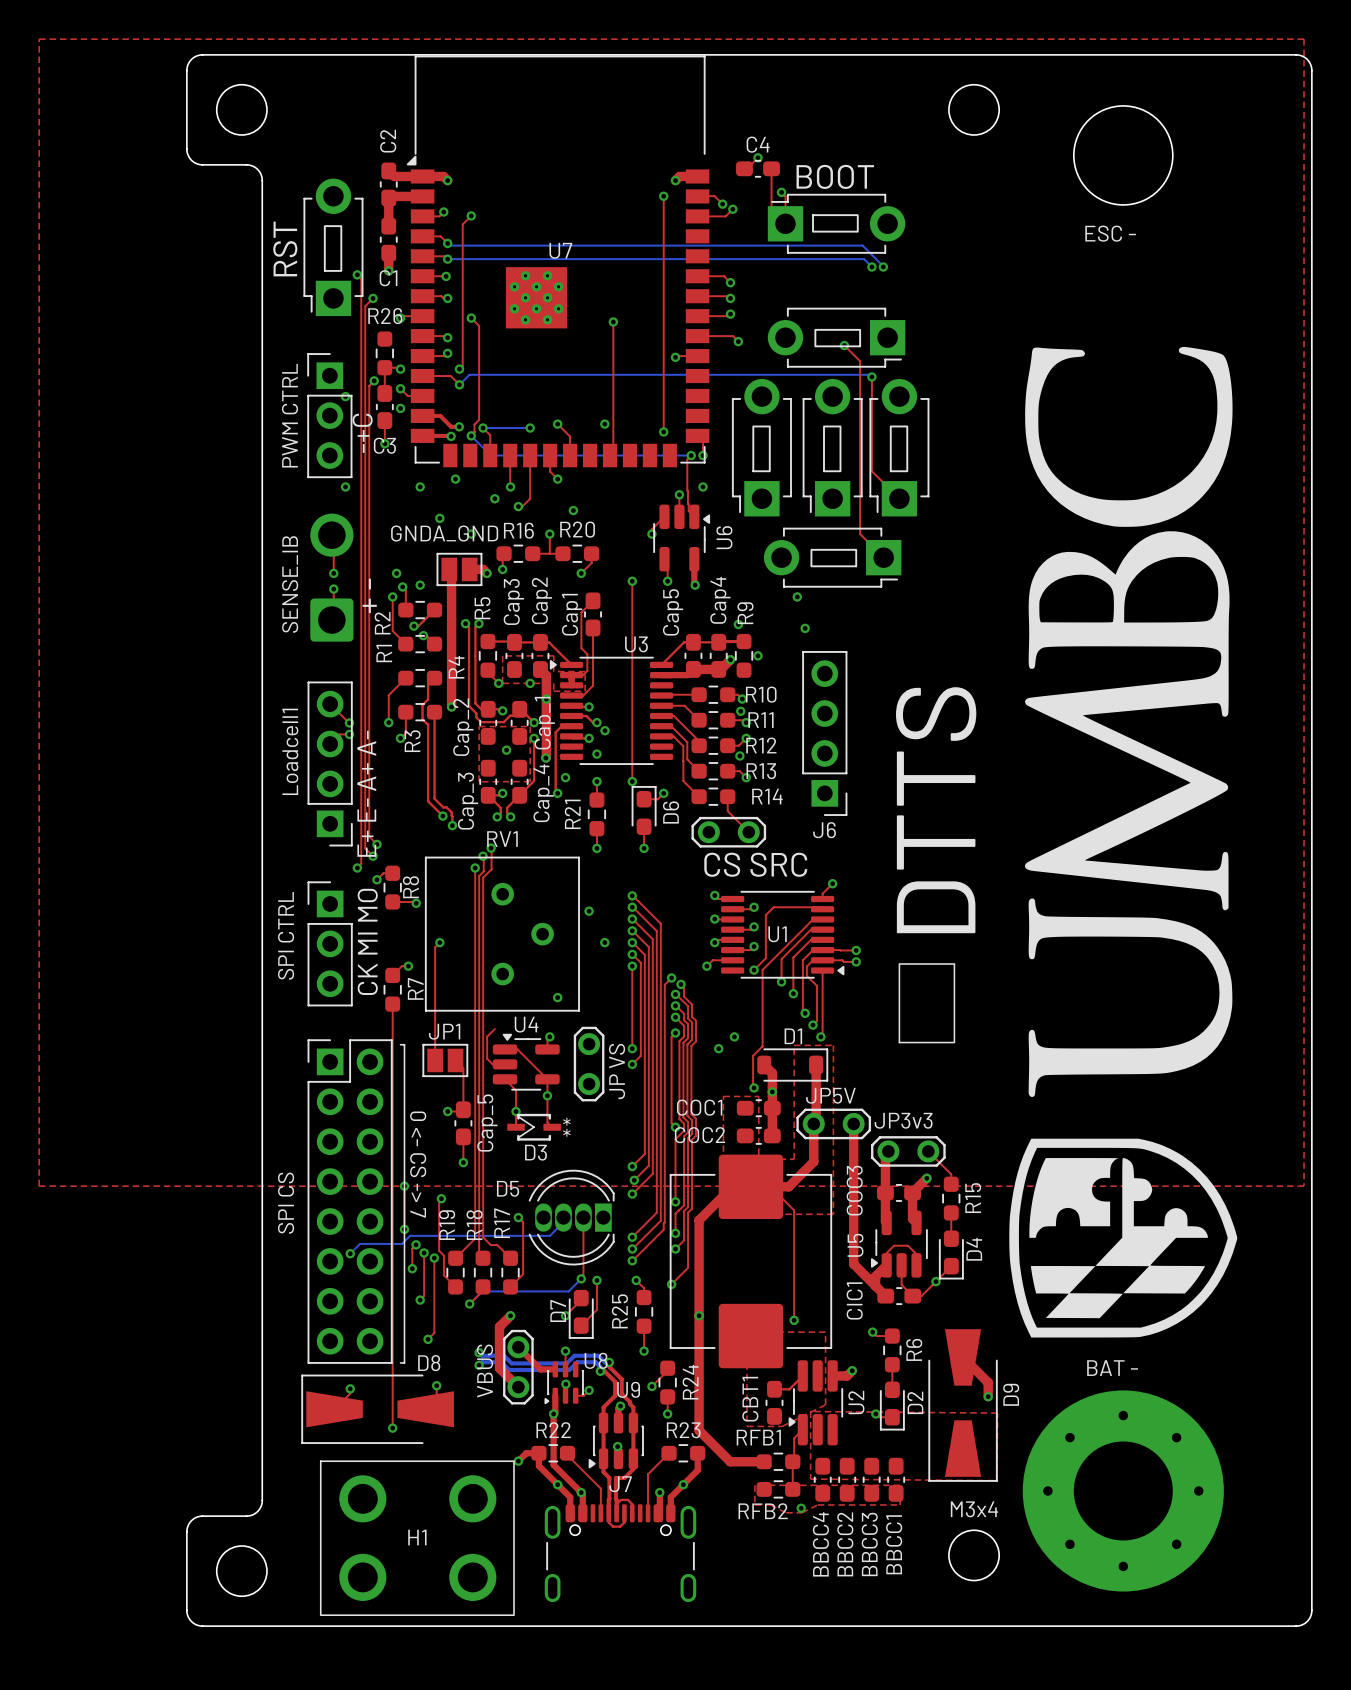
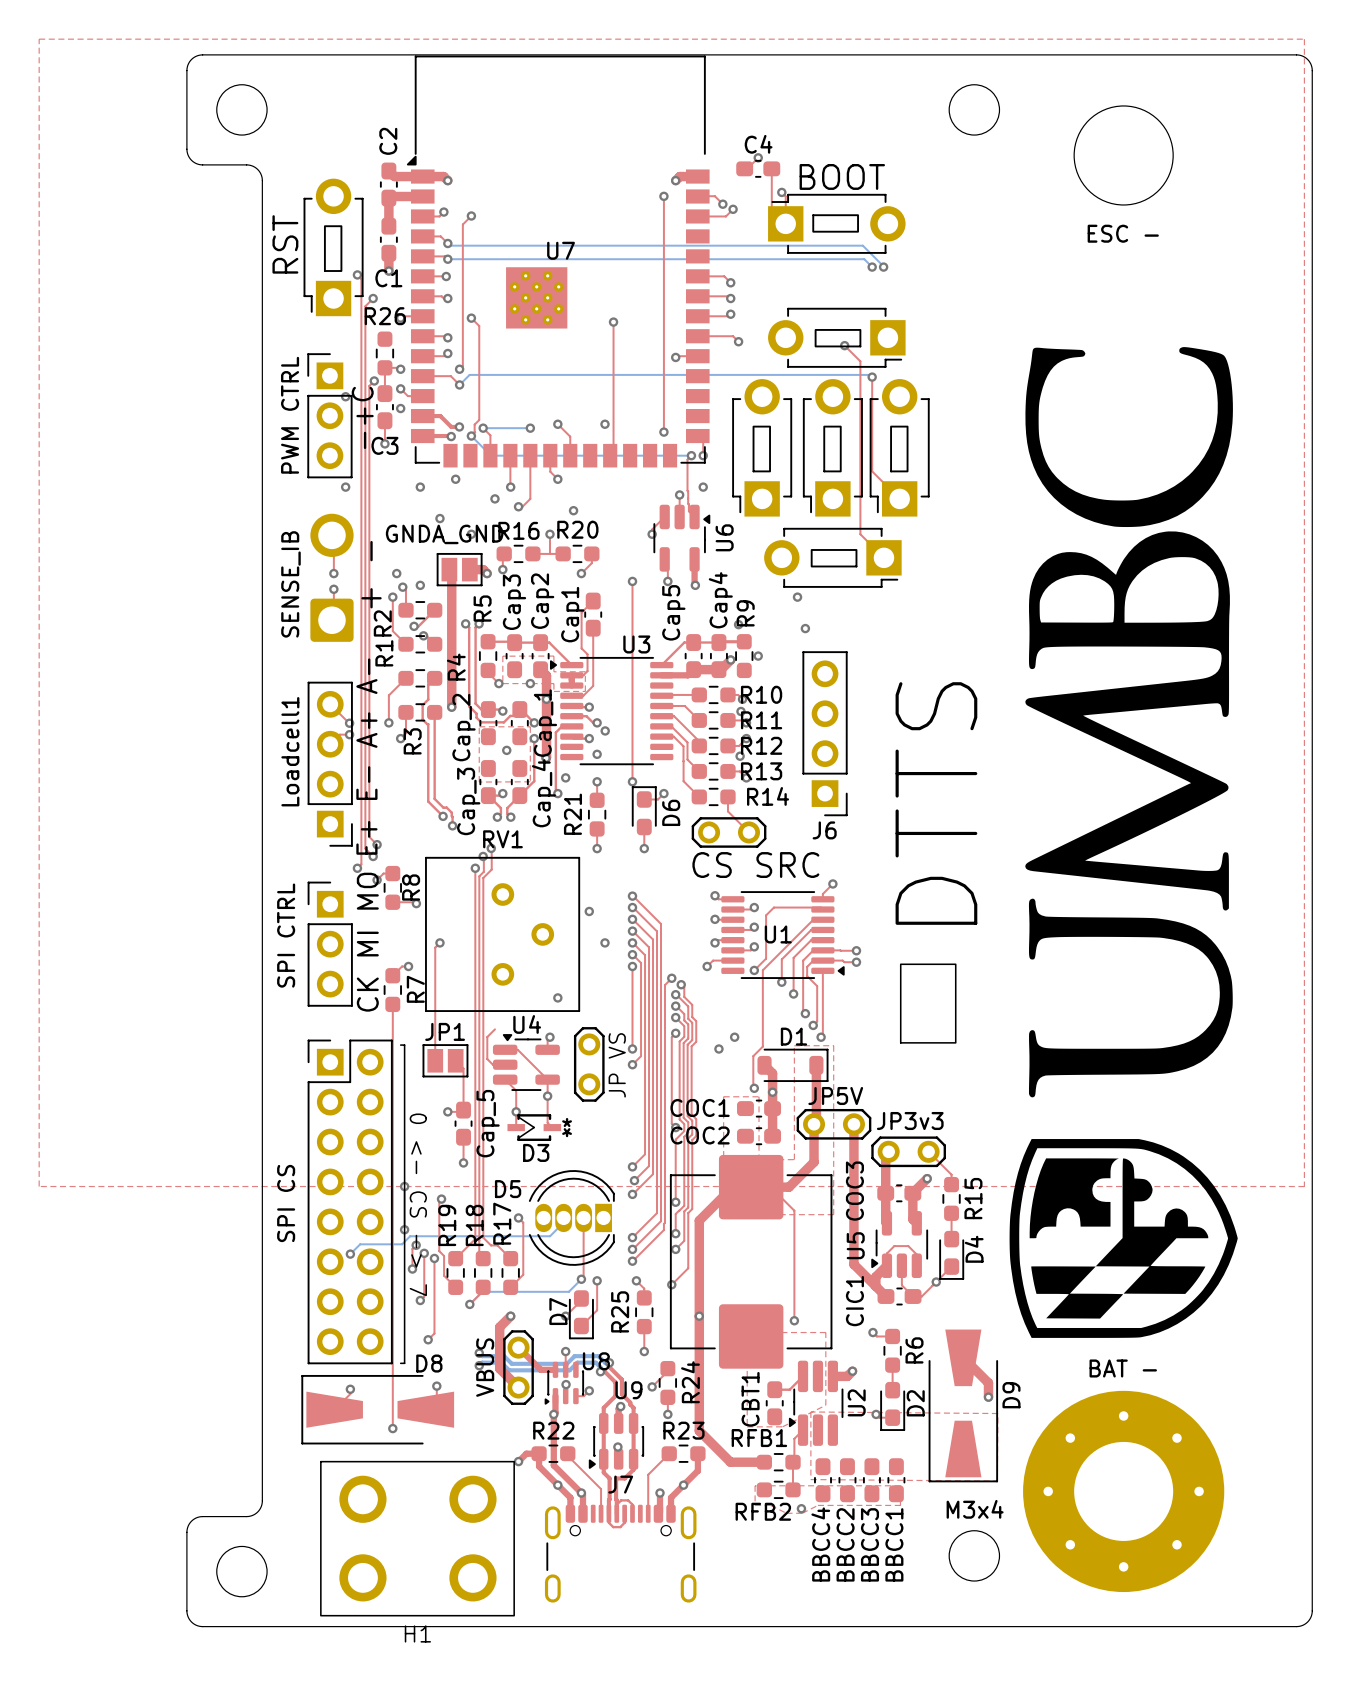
H1 name position: H1 (417, 1537) -> H1 (417, 1633)

